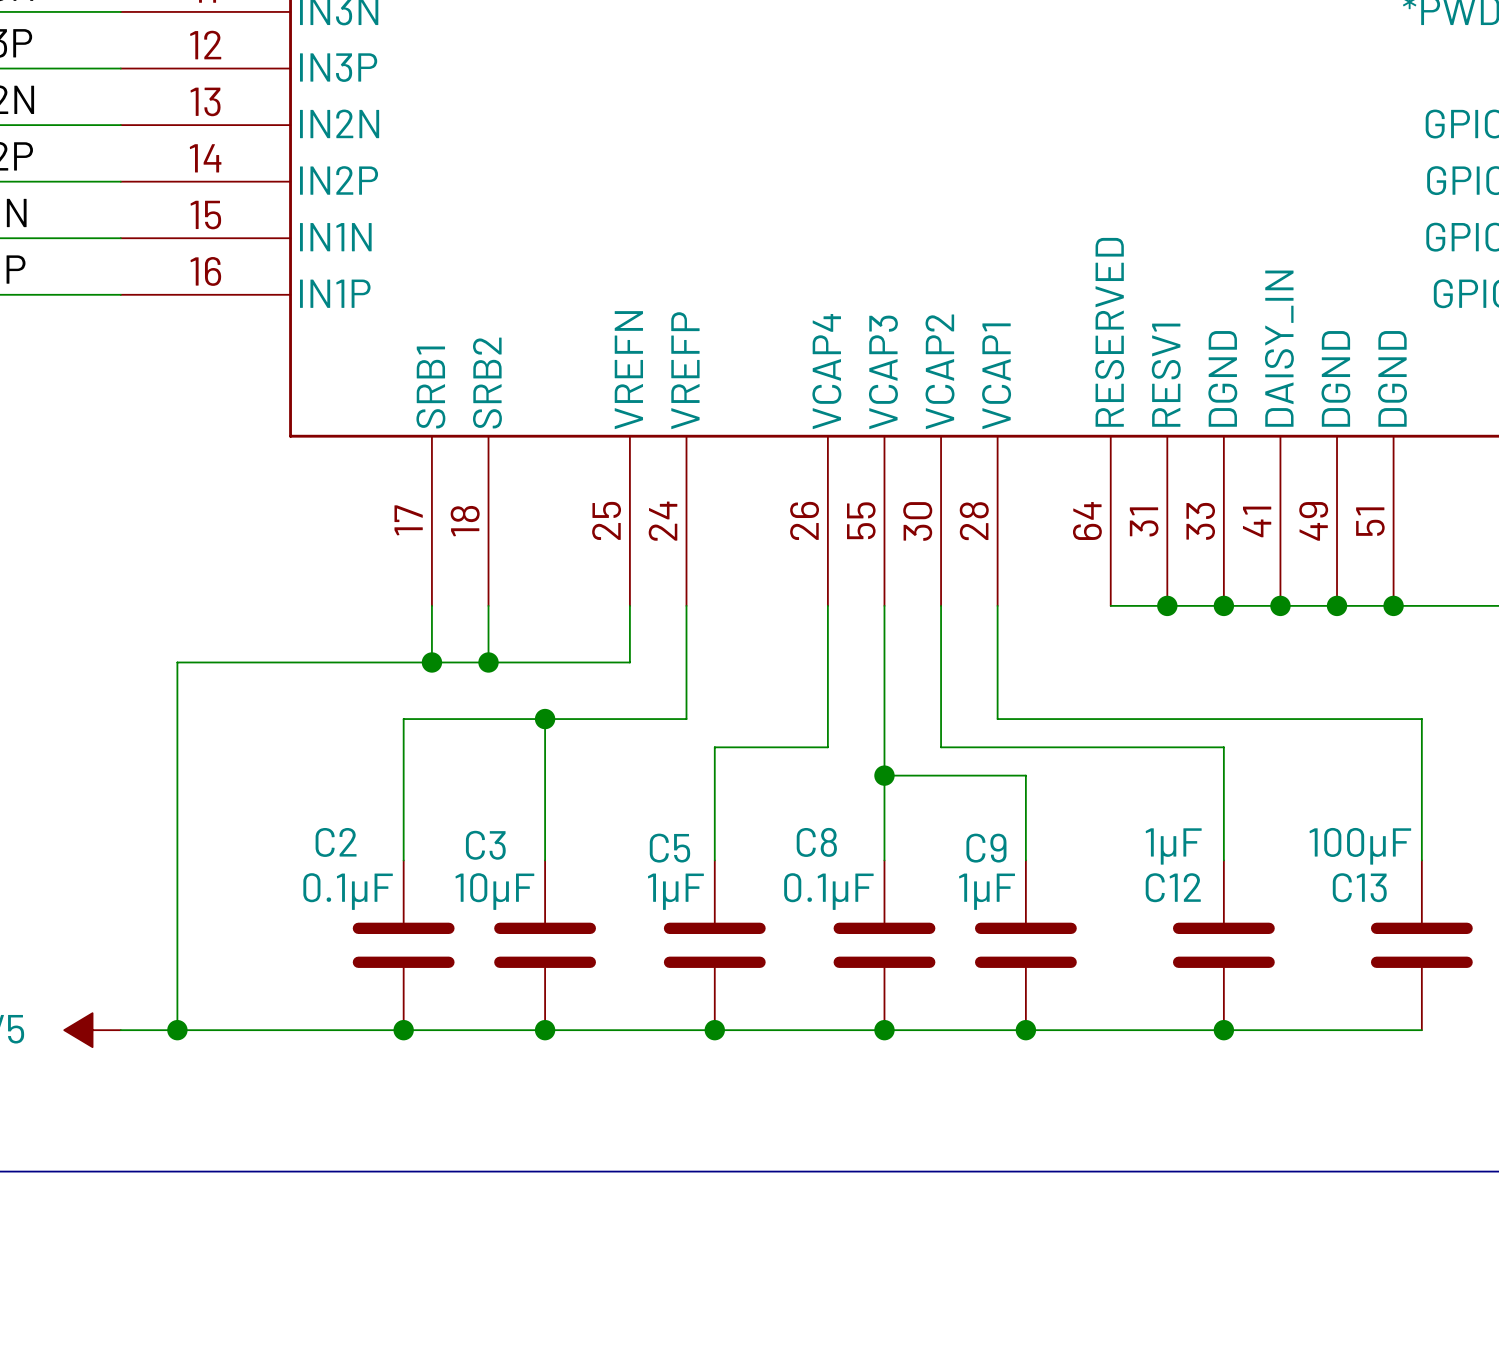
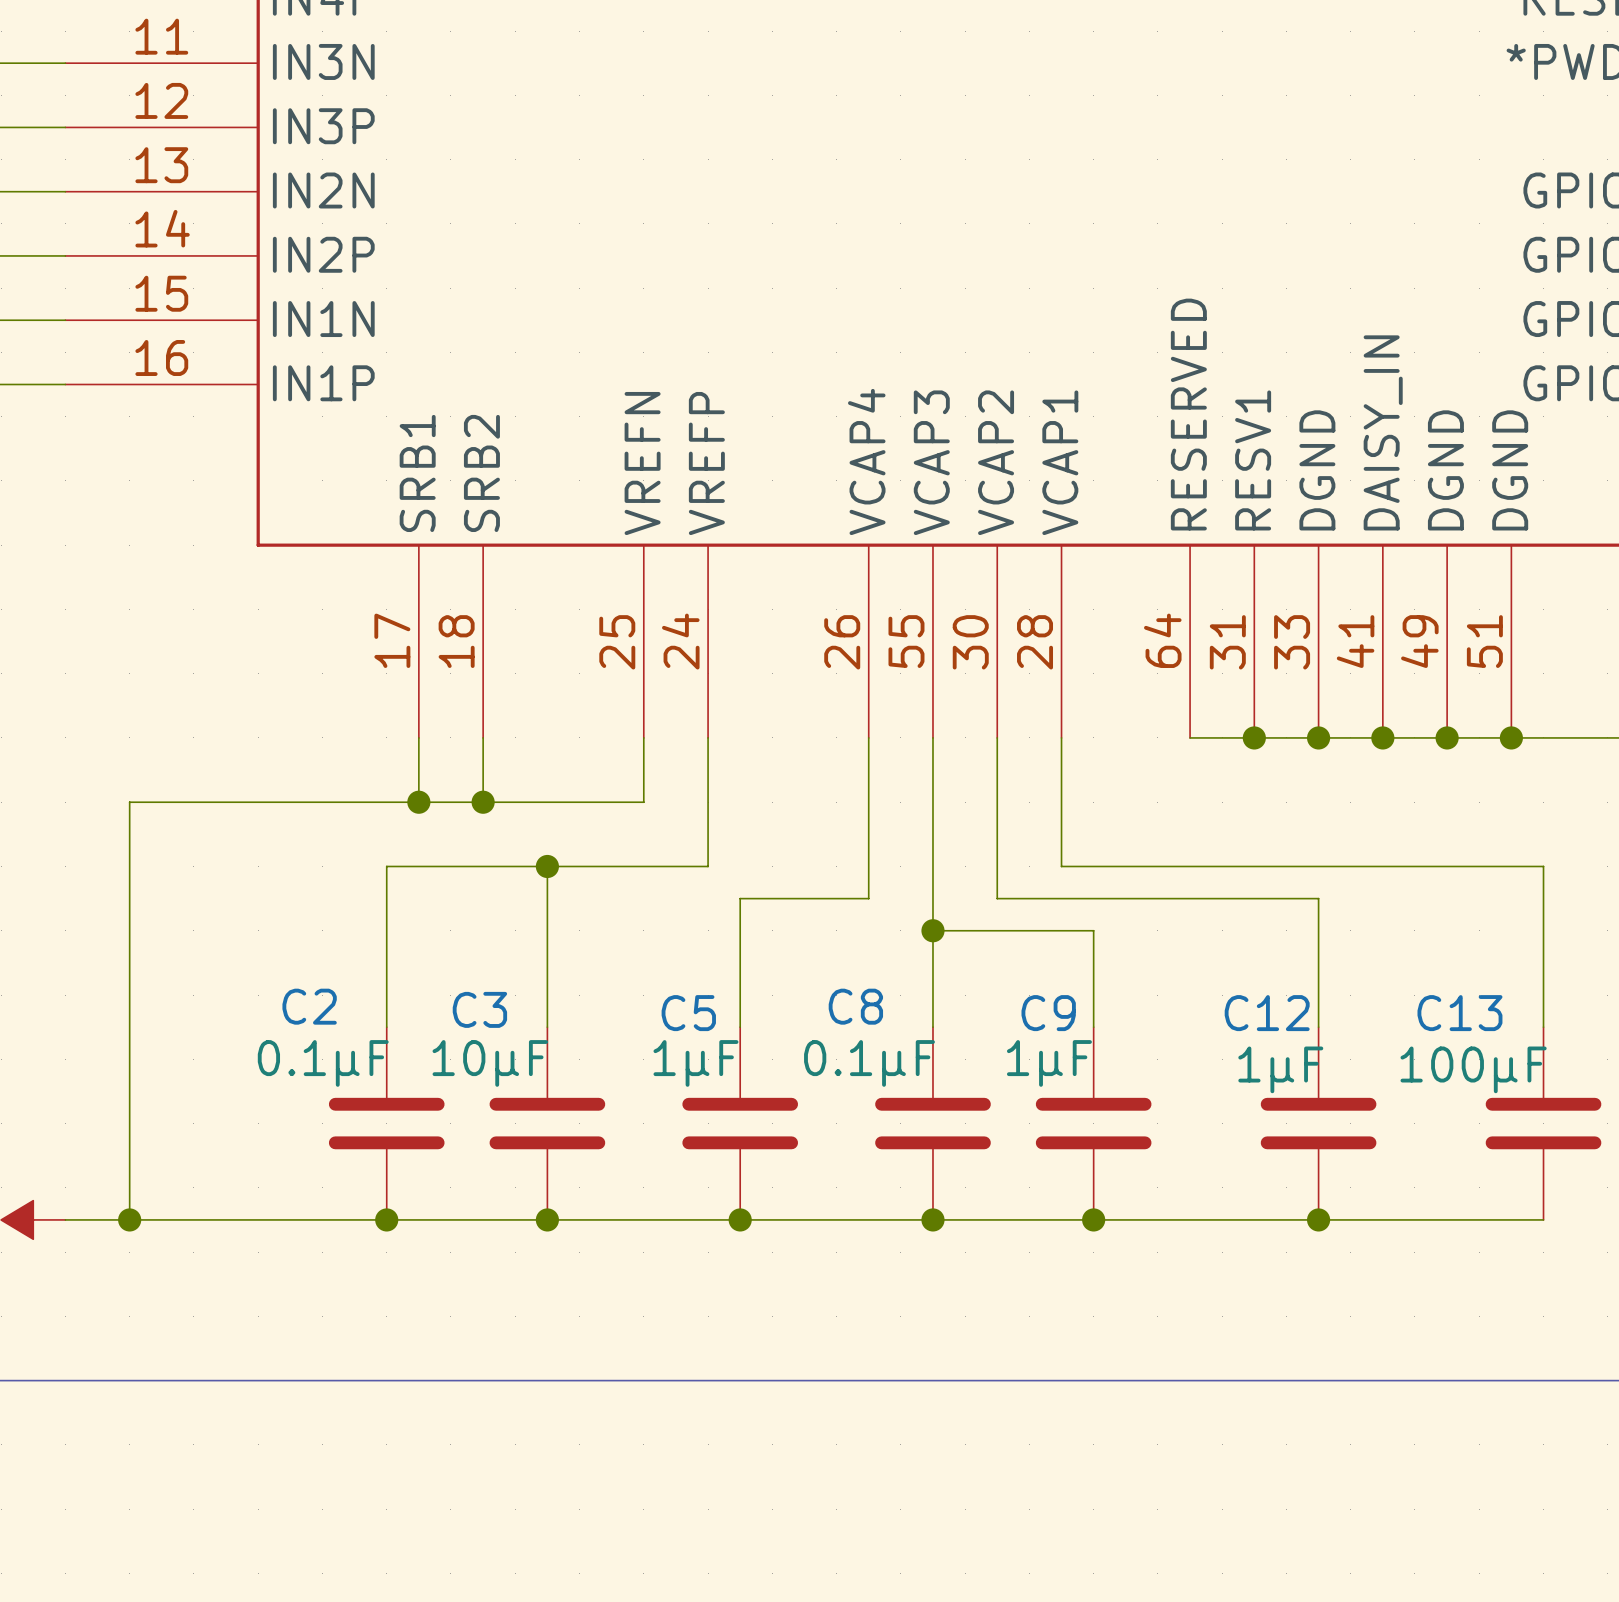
C12 value position: 1µF (1173, 846) -> 1µF (1280, 1069)
C13 value position: 100µF (1360, 846) -> 100µF (1473, 1069)
C12 name position: C12 (1173, 887) -> C12 (1267, 1013)
C13 name position: C13 (1359, 887) -> C13 (1459, 1013)

